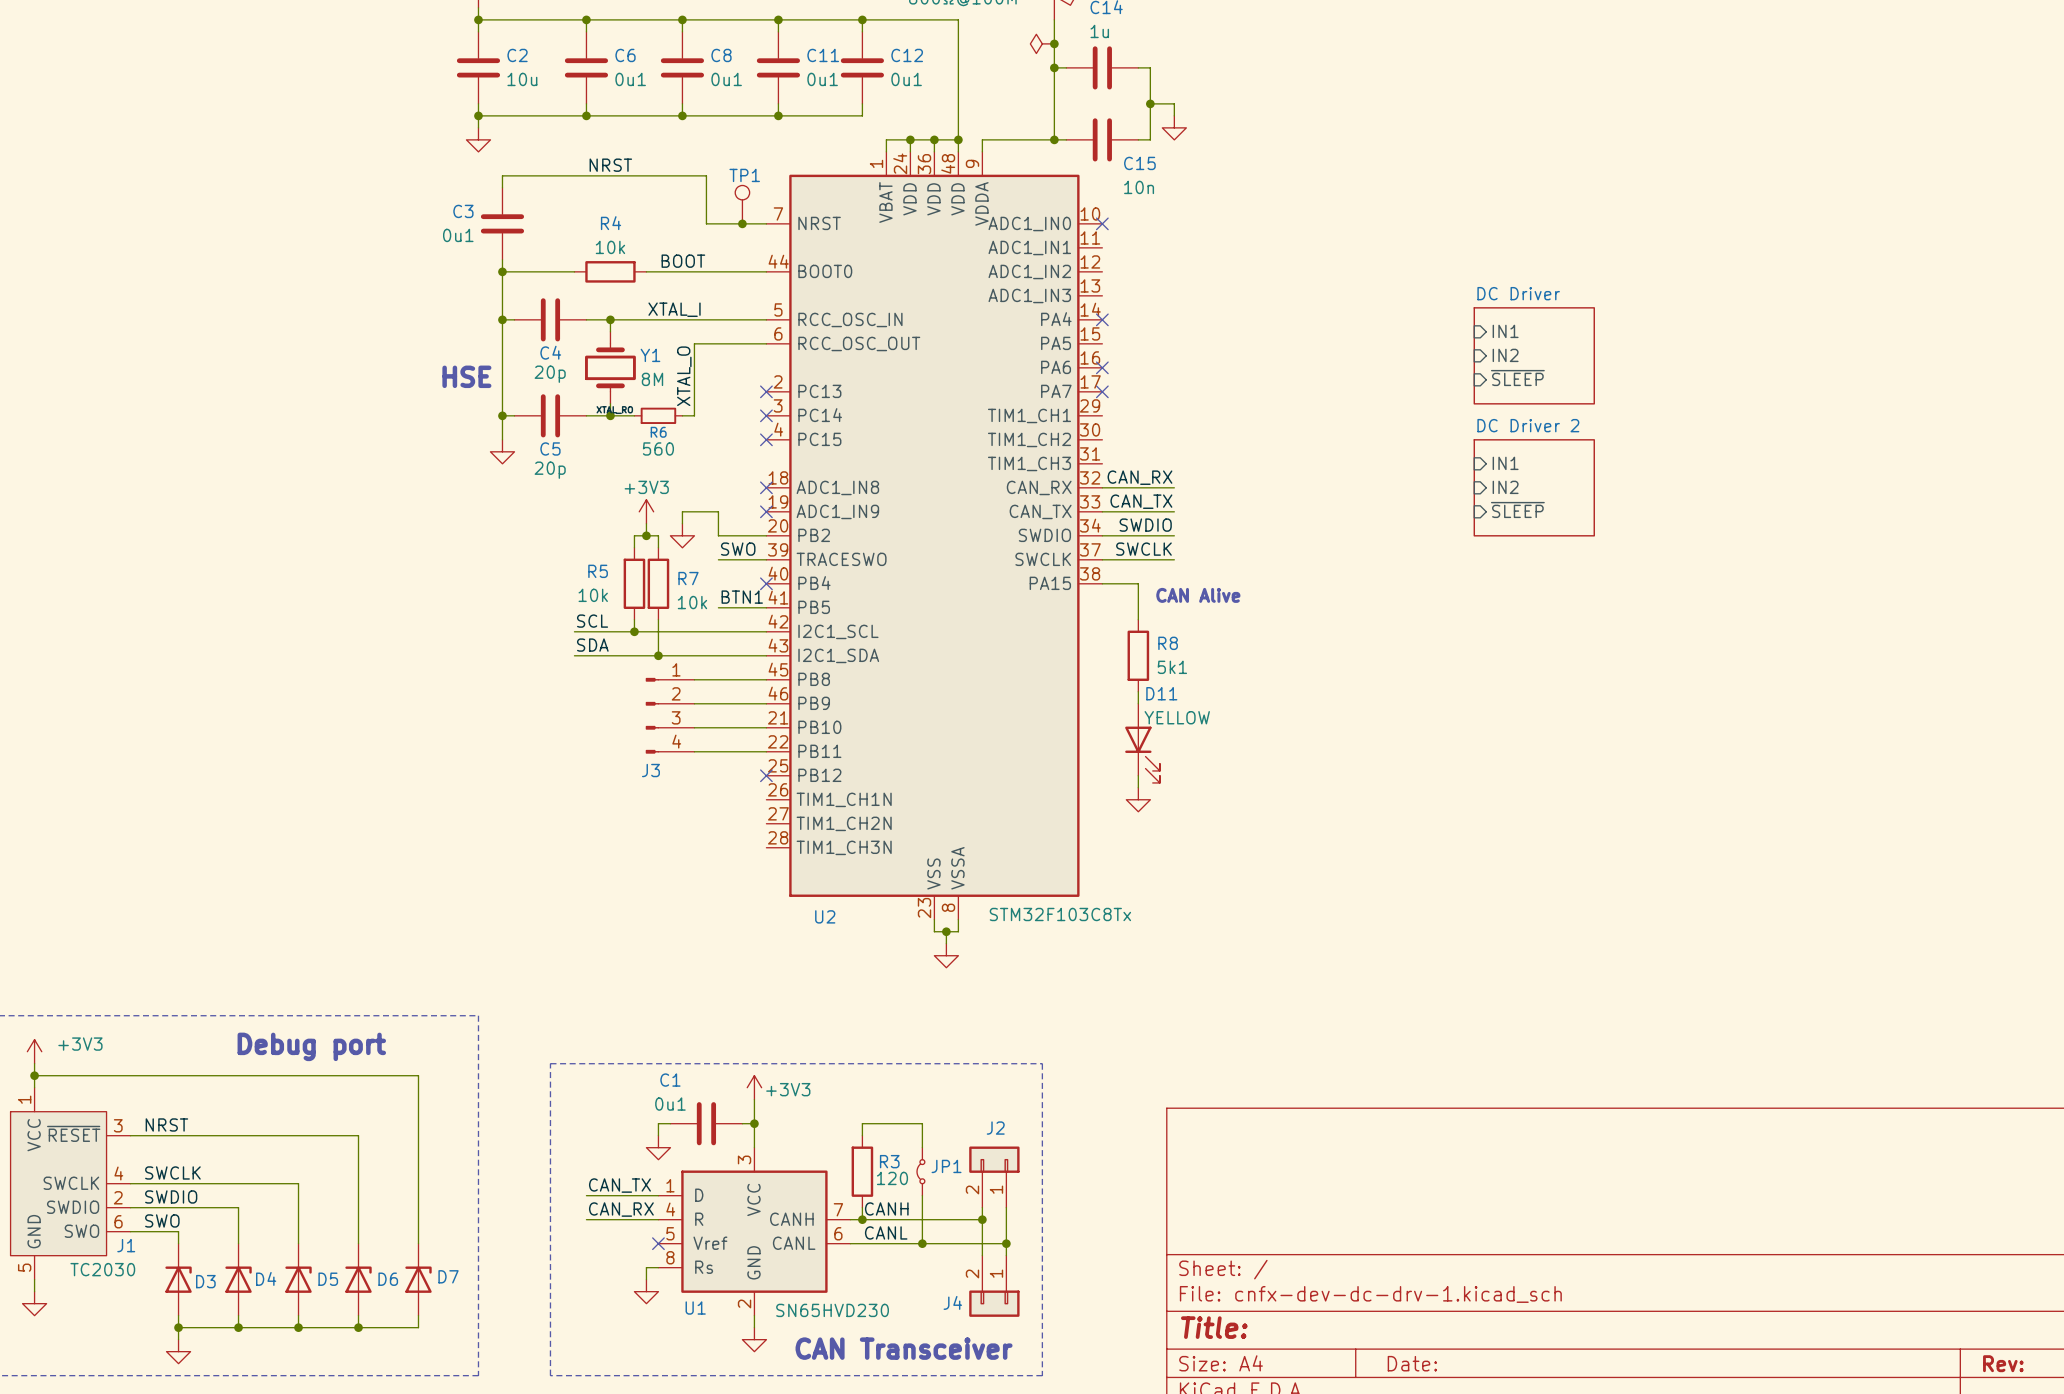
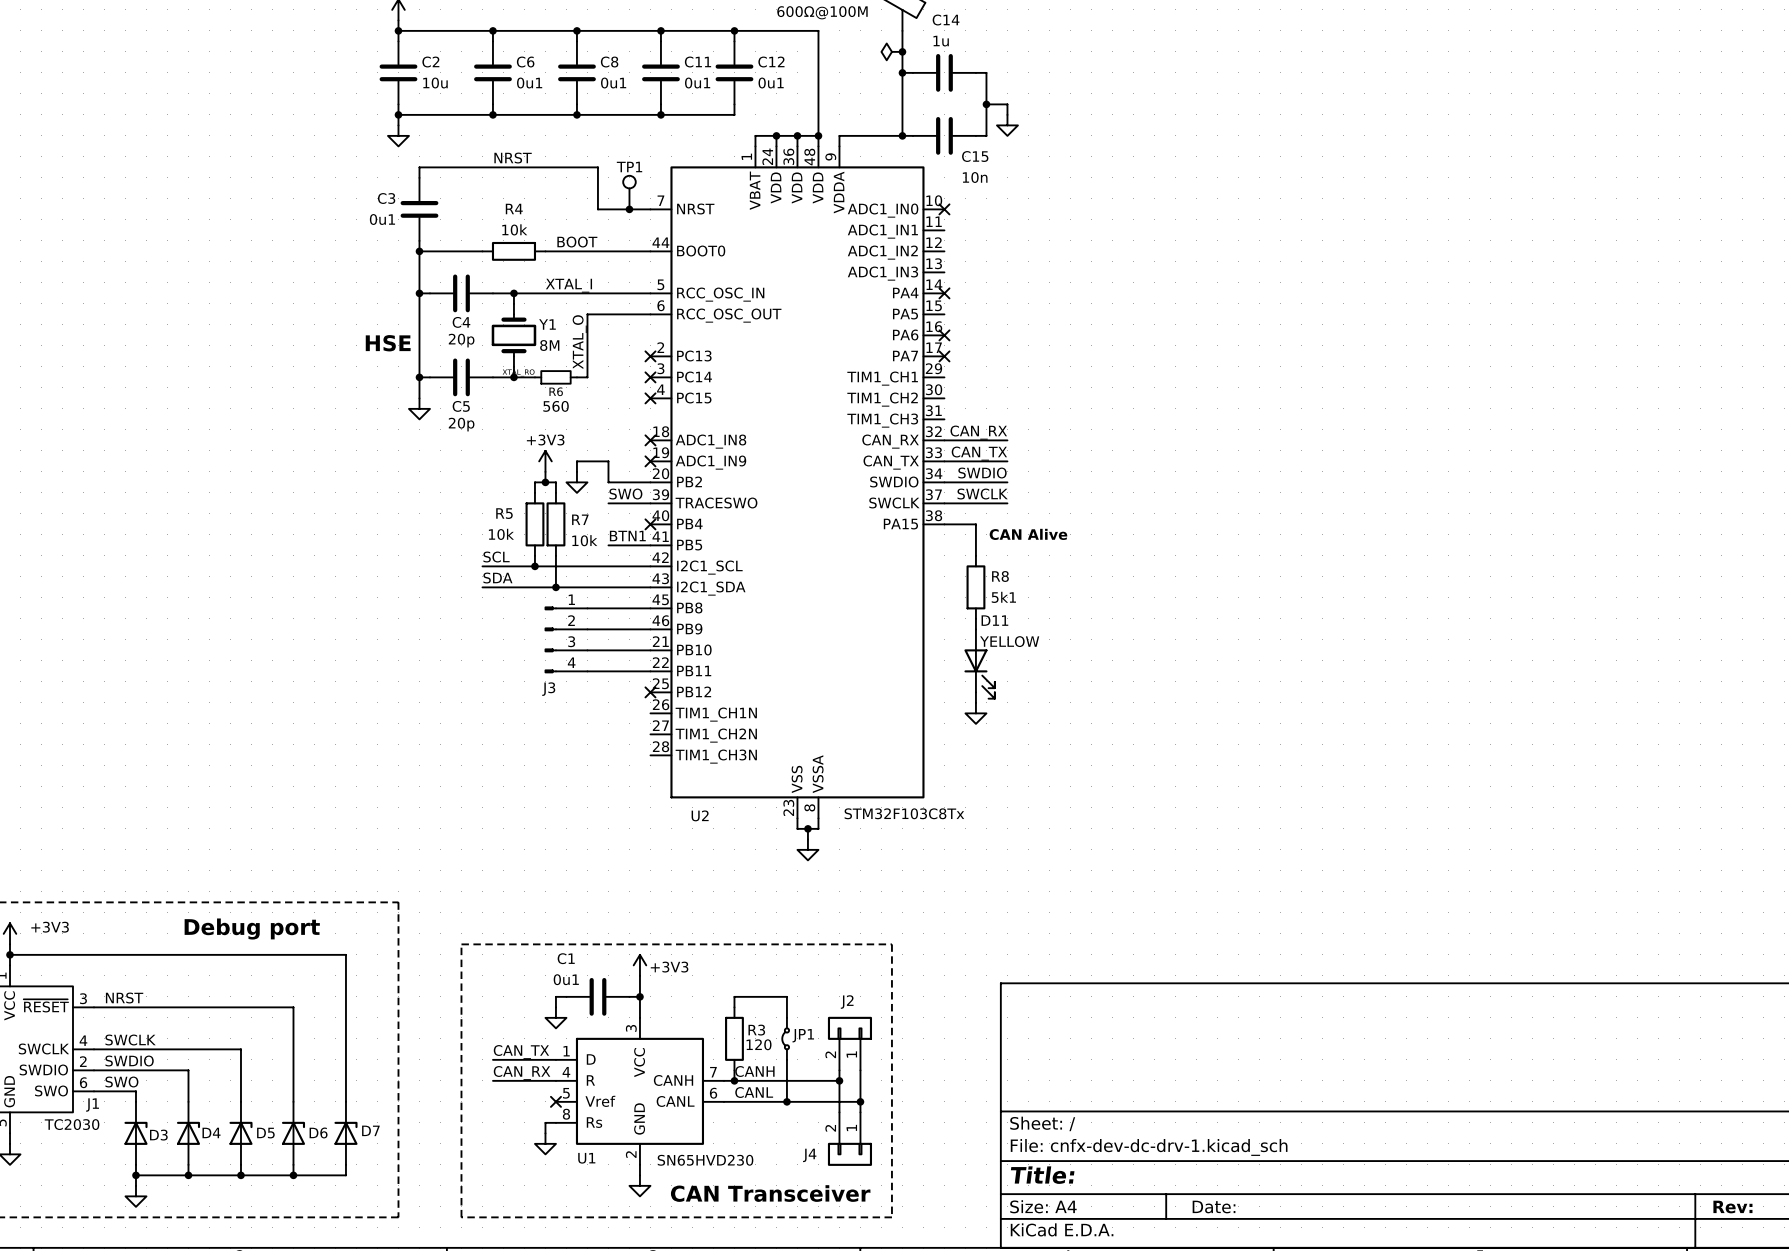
sheet pin: IN1 (1505, 331) -> none
sheet pin: IN2 (1505, 355) -> none
sheet DC Driver: (1534, 355) -> none
sheet pin: ~{SLEEP} (1517, 378) -> none
sheet pin: IN1 (1505, 463) -> none
sheet pin: IN2 (1505, 487) -> none
sheet DC Driver 2: (1534, 487) -> none
sheet pin: ~{SLEEP} (1517, 509) -> none

